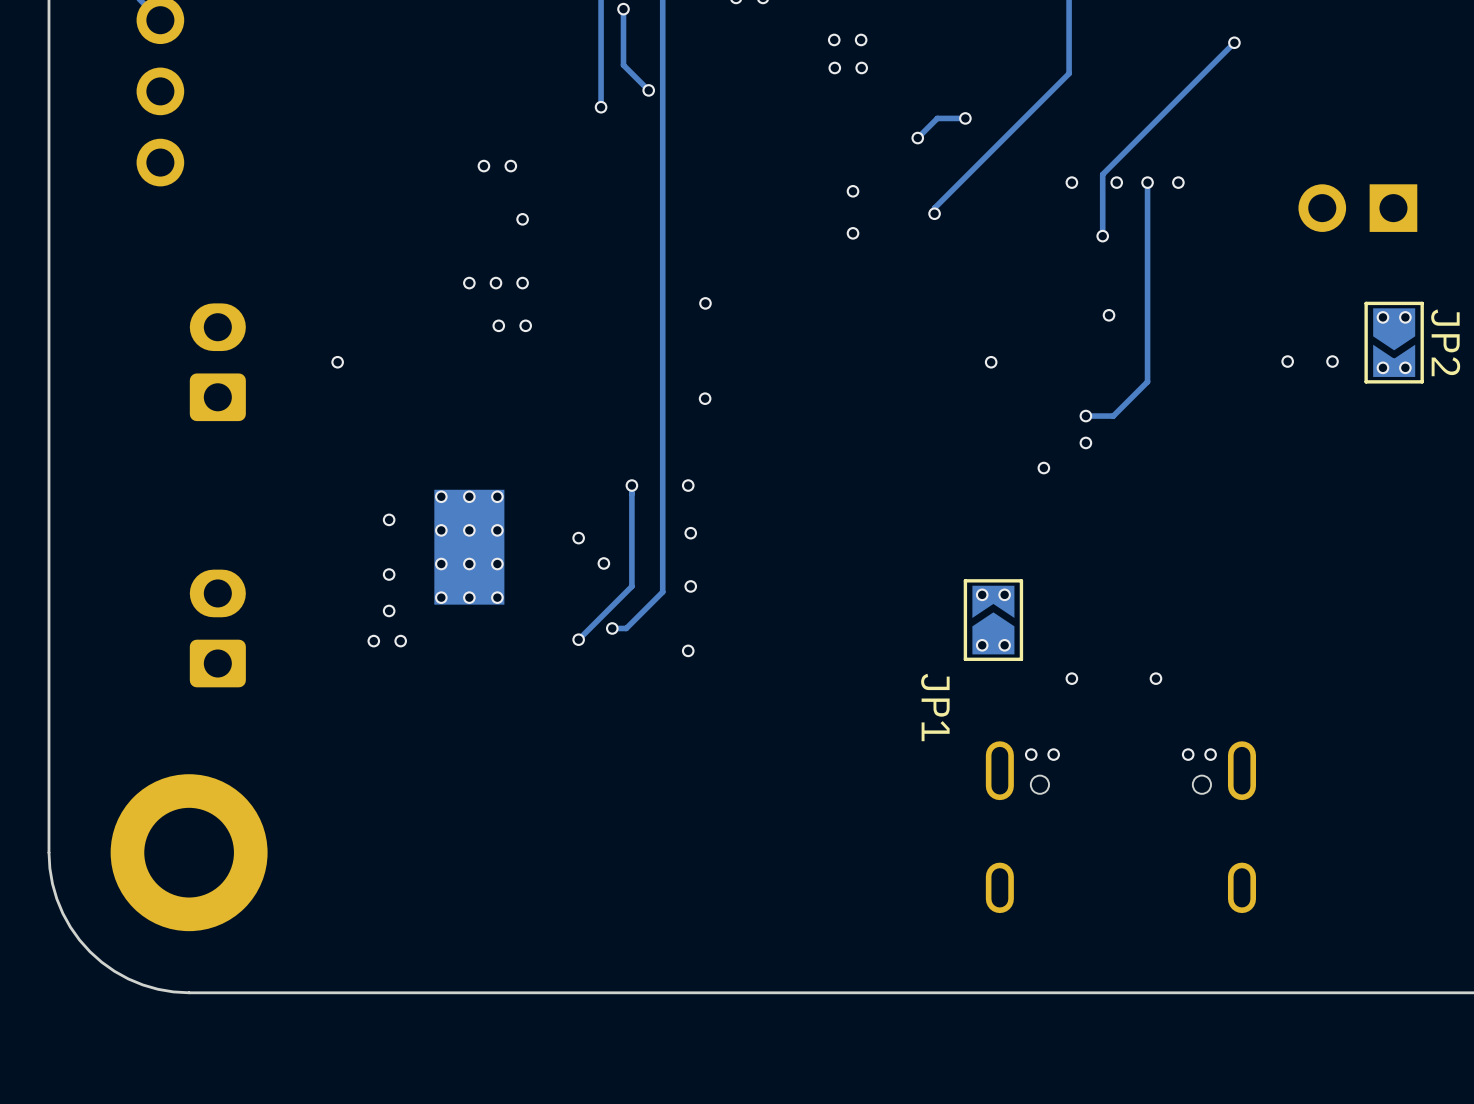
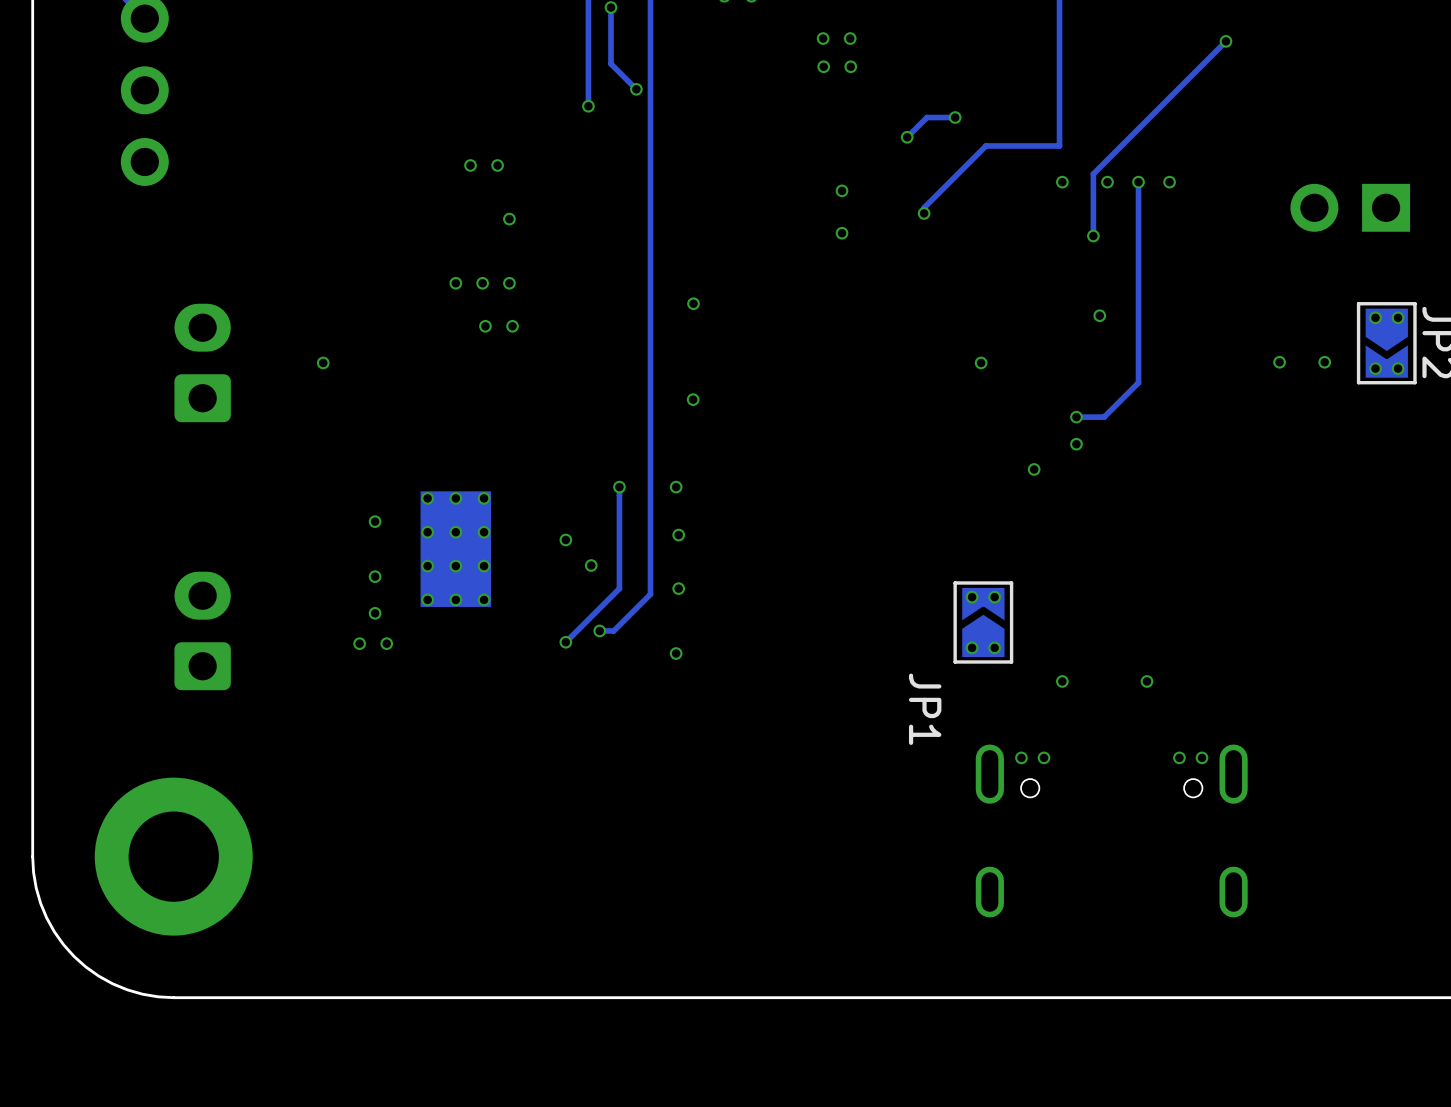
track: (1069, 73) (995, 146) -> (1059, 72) (1059, 145) (985, 145)

